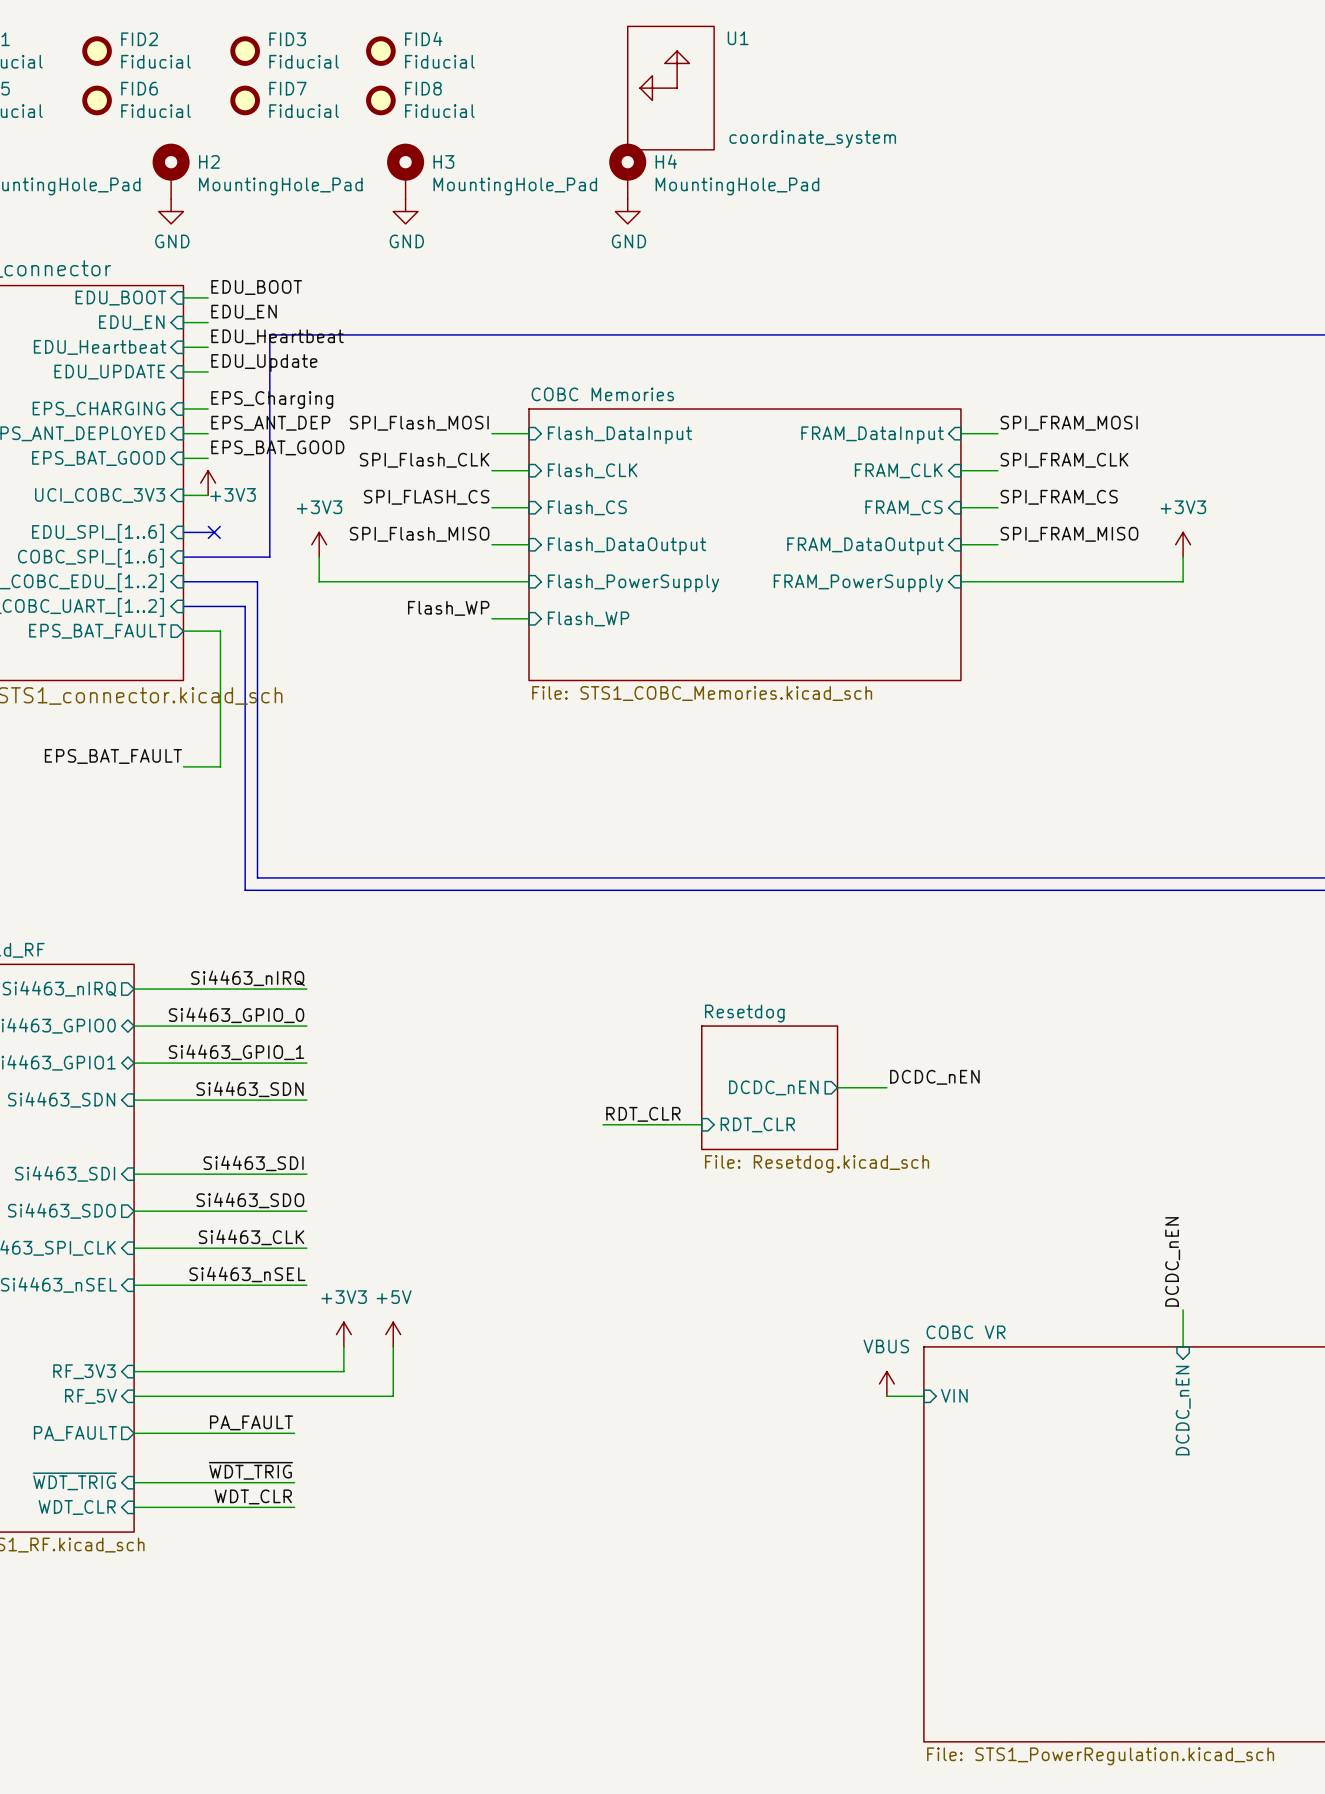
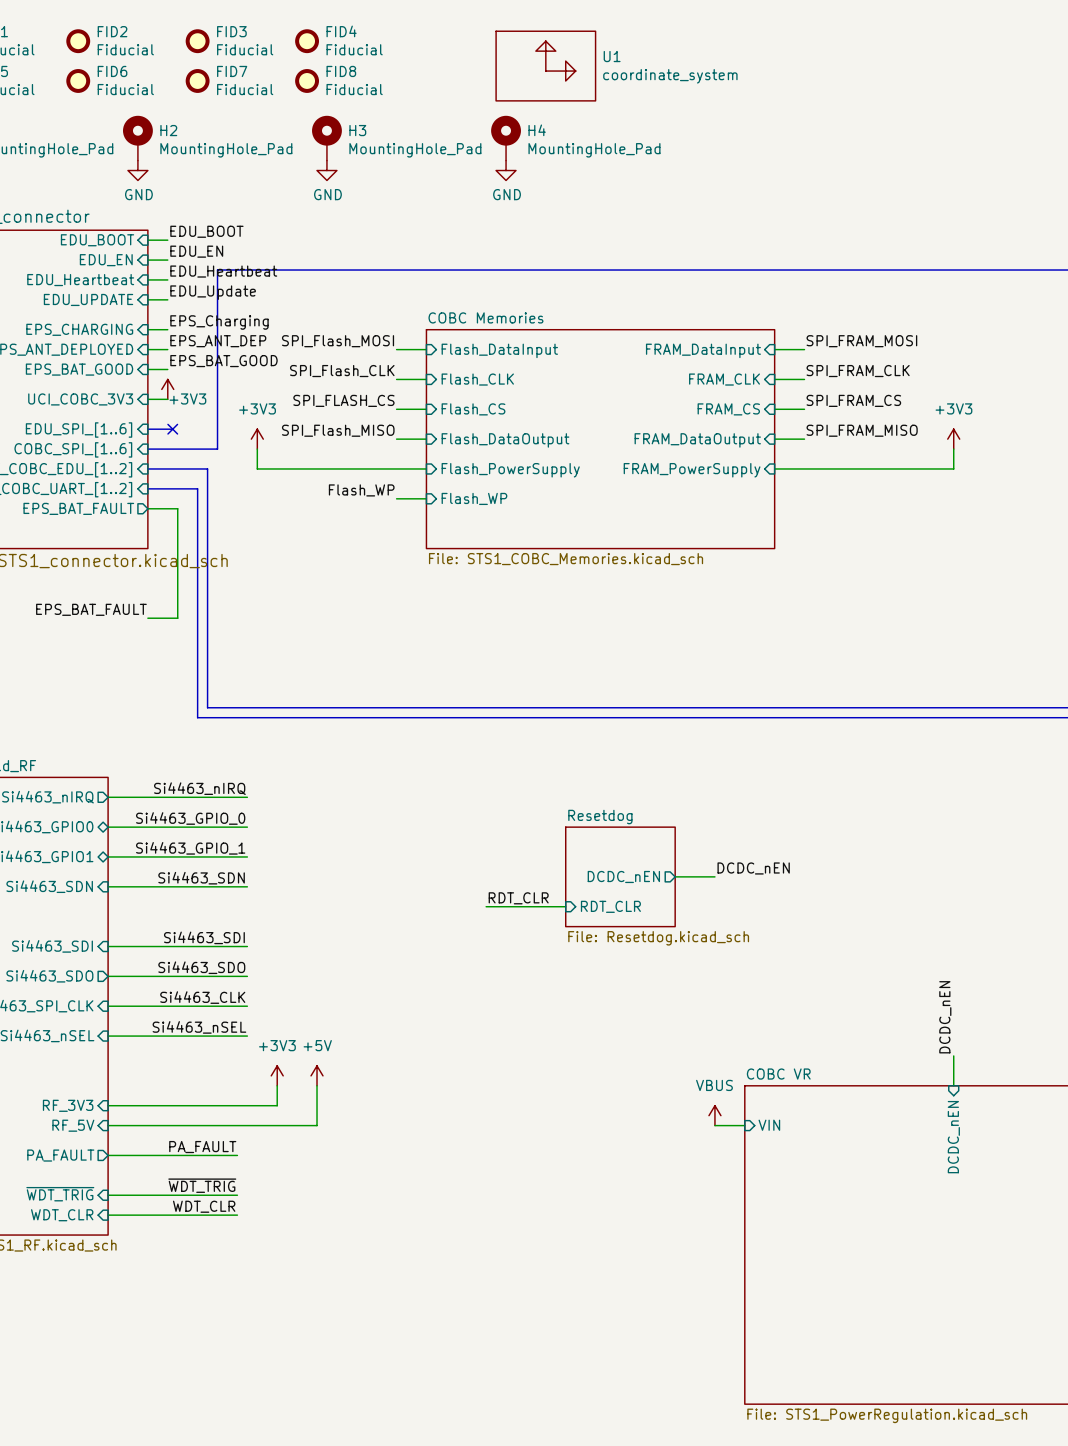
U1 name position: U1 (738, 38) -> U1 (612, 56)
U1 rotation: 0° (670, 88) -> 90° clockwise (545, 66)
U1 value position: coordinate_system (812, 139) -> coordinate_system (670, 76)

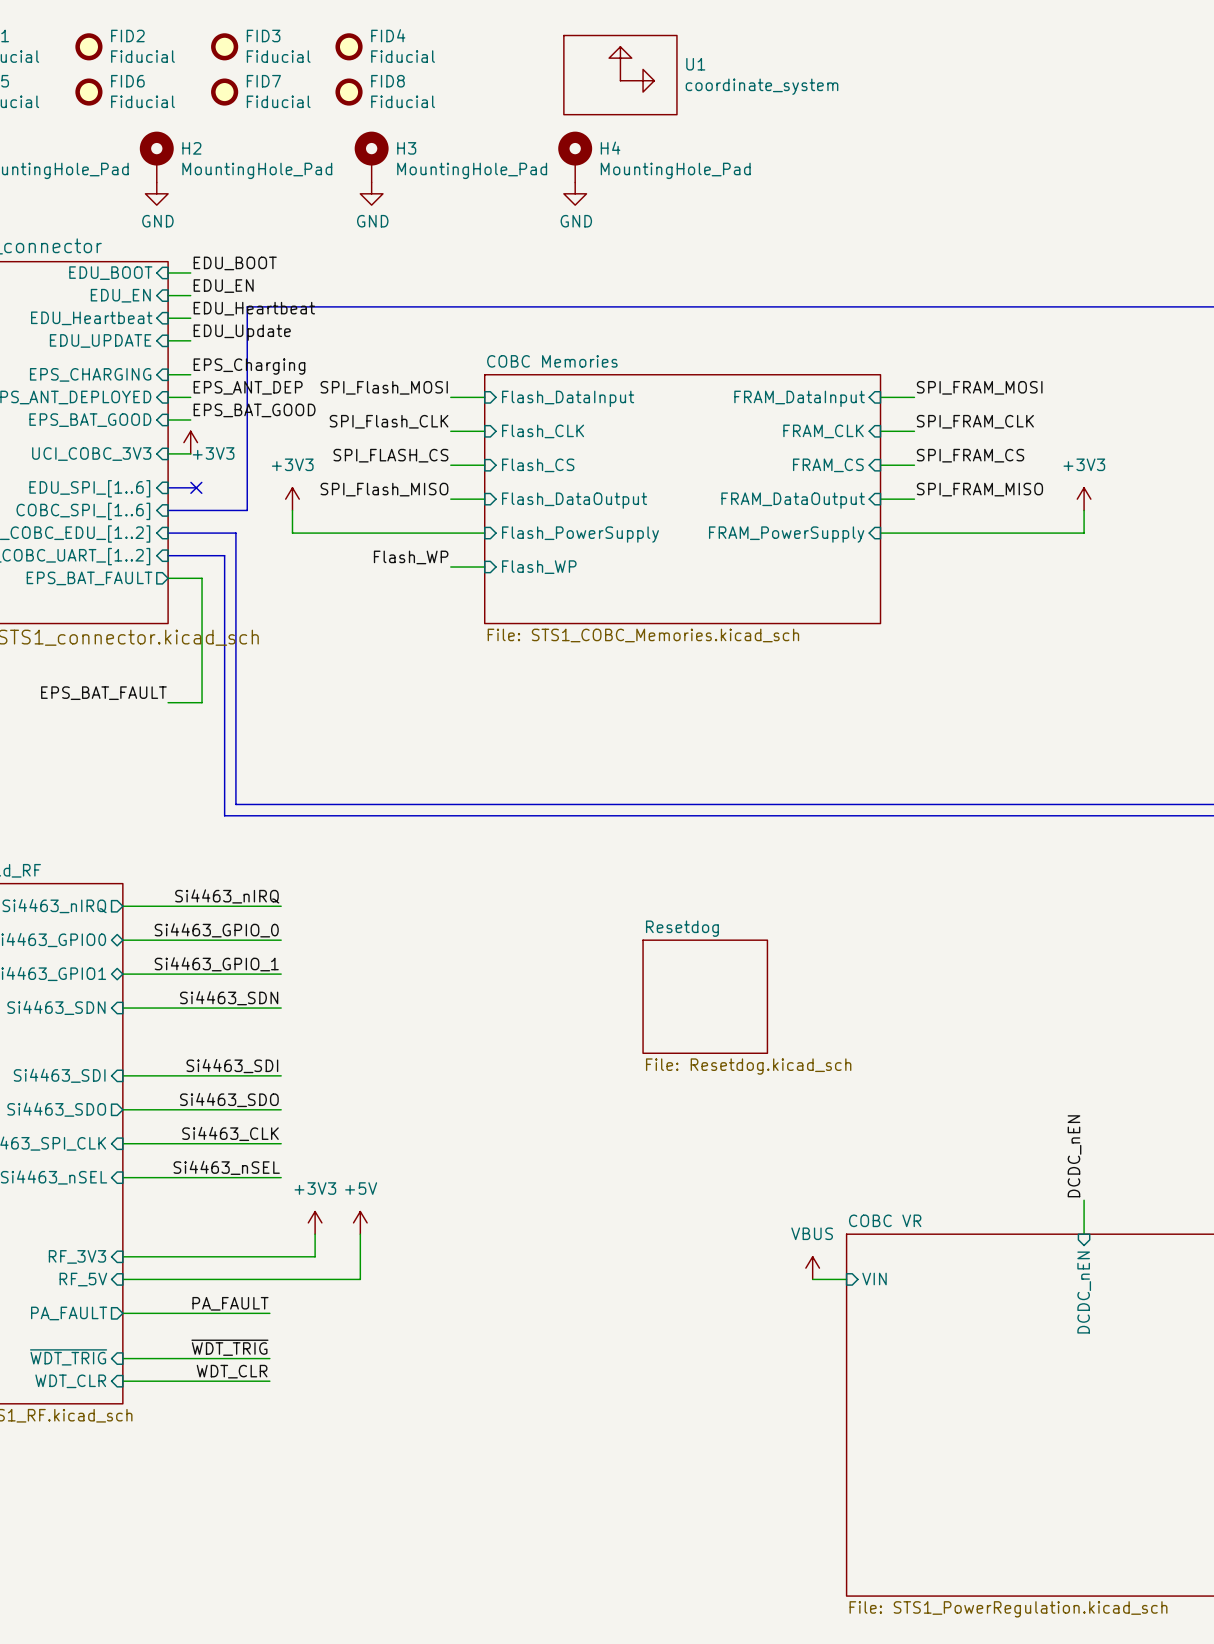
label: DCDC_nEN (753, 868) -> none
sheet pin: DCDC_nEN (623, 876) -> none
wire: (675, 876) (714, 876) -> none
label: RDT_CLR (518, 898) -> none
wire: (486, 906) (565, 906) -> none
sheet pin: RDT_CLR (610, 906) -> none

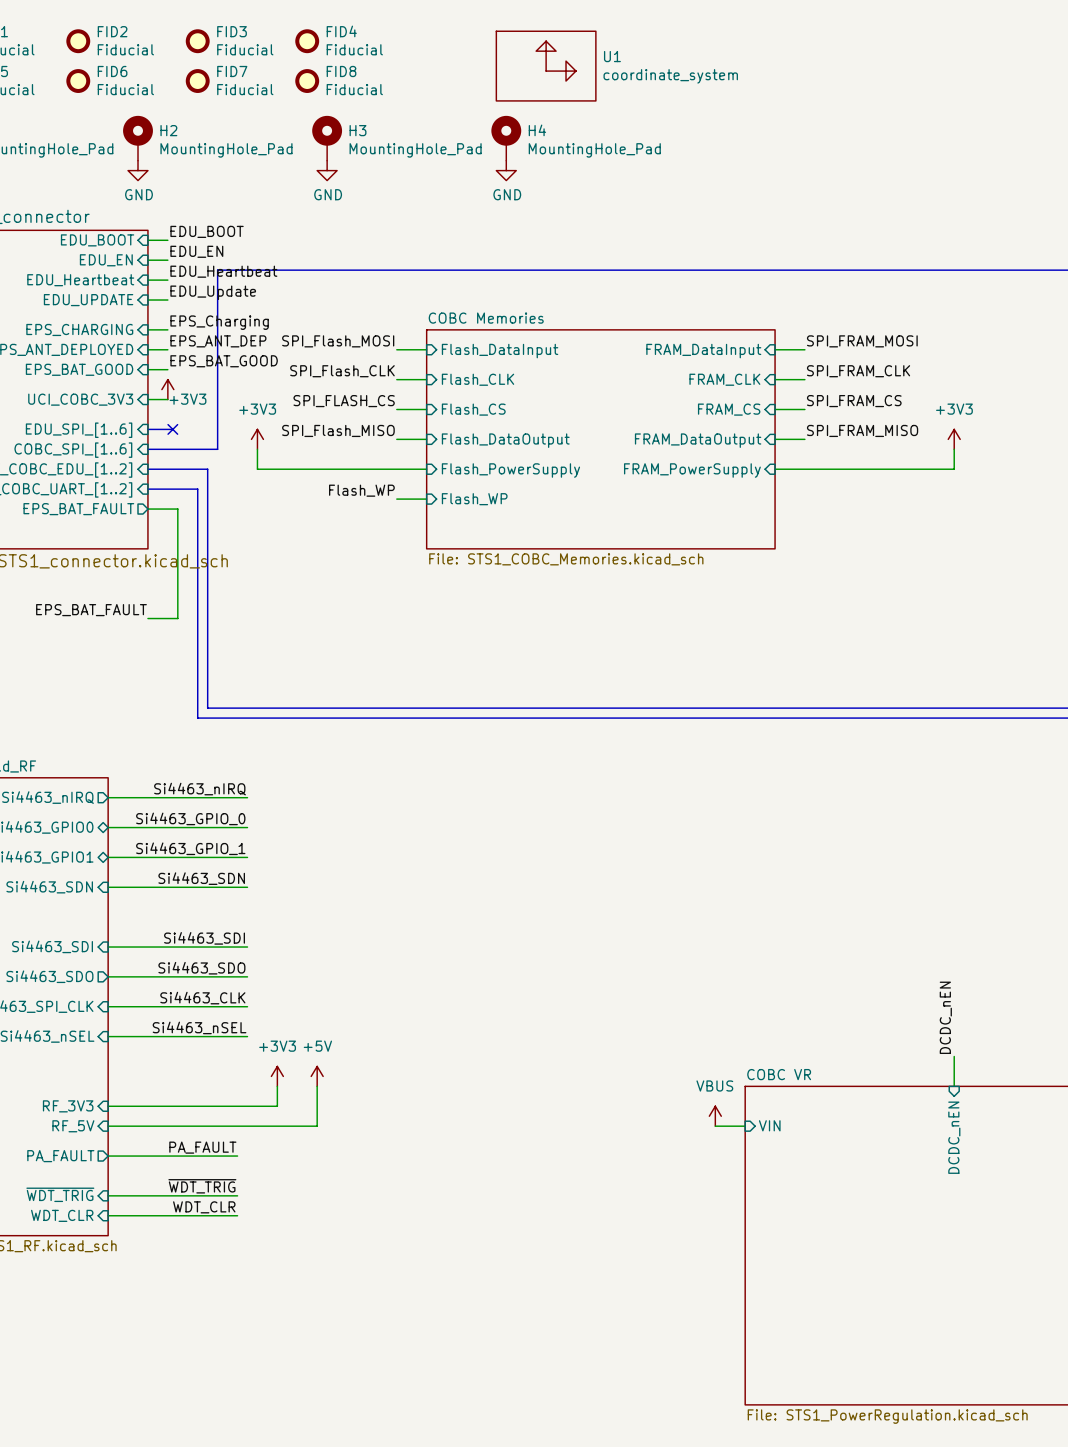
sheet Resetdog: File: Resetdog.kicad_sch (705, 996) -> none

